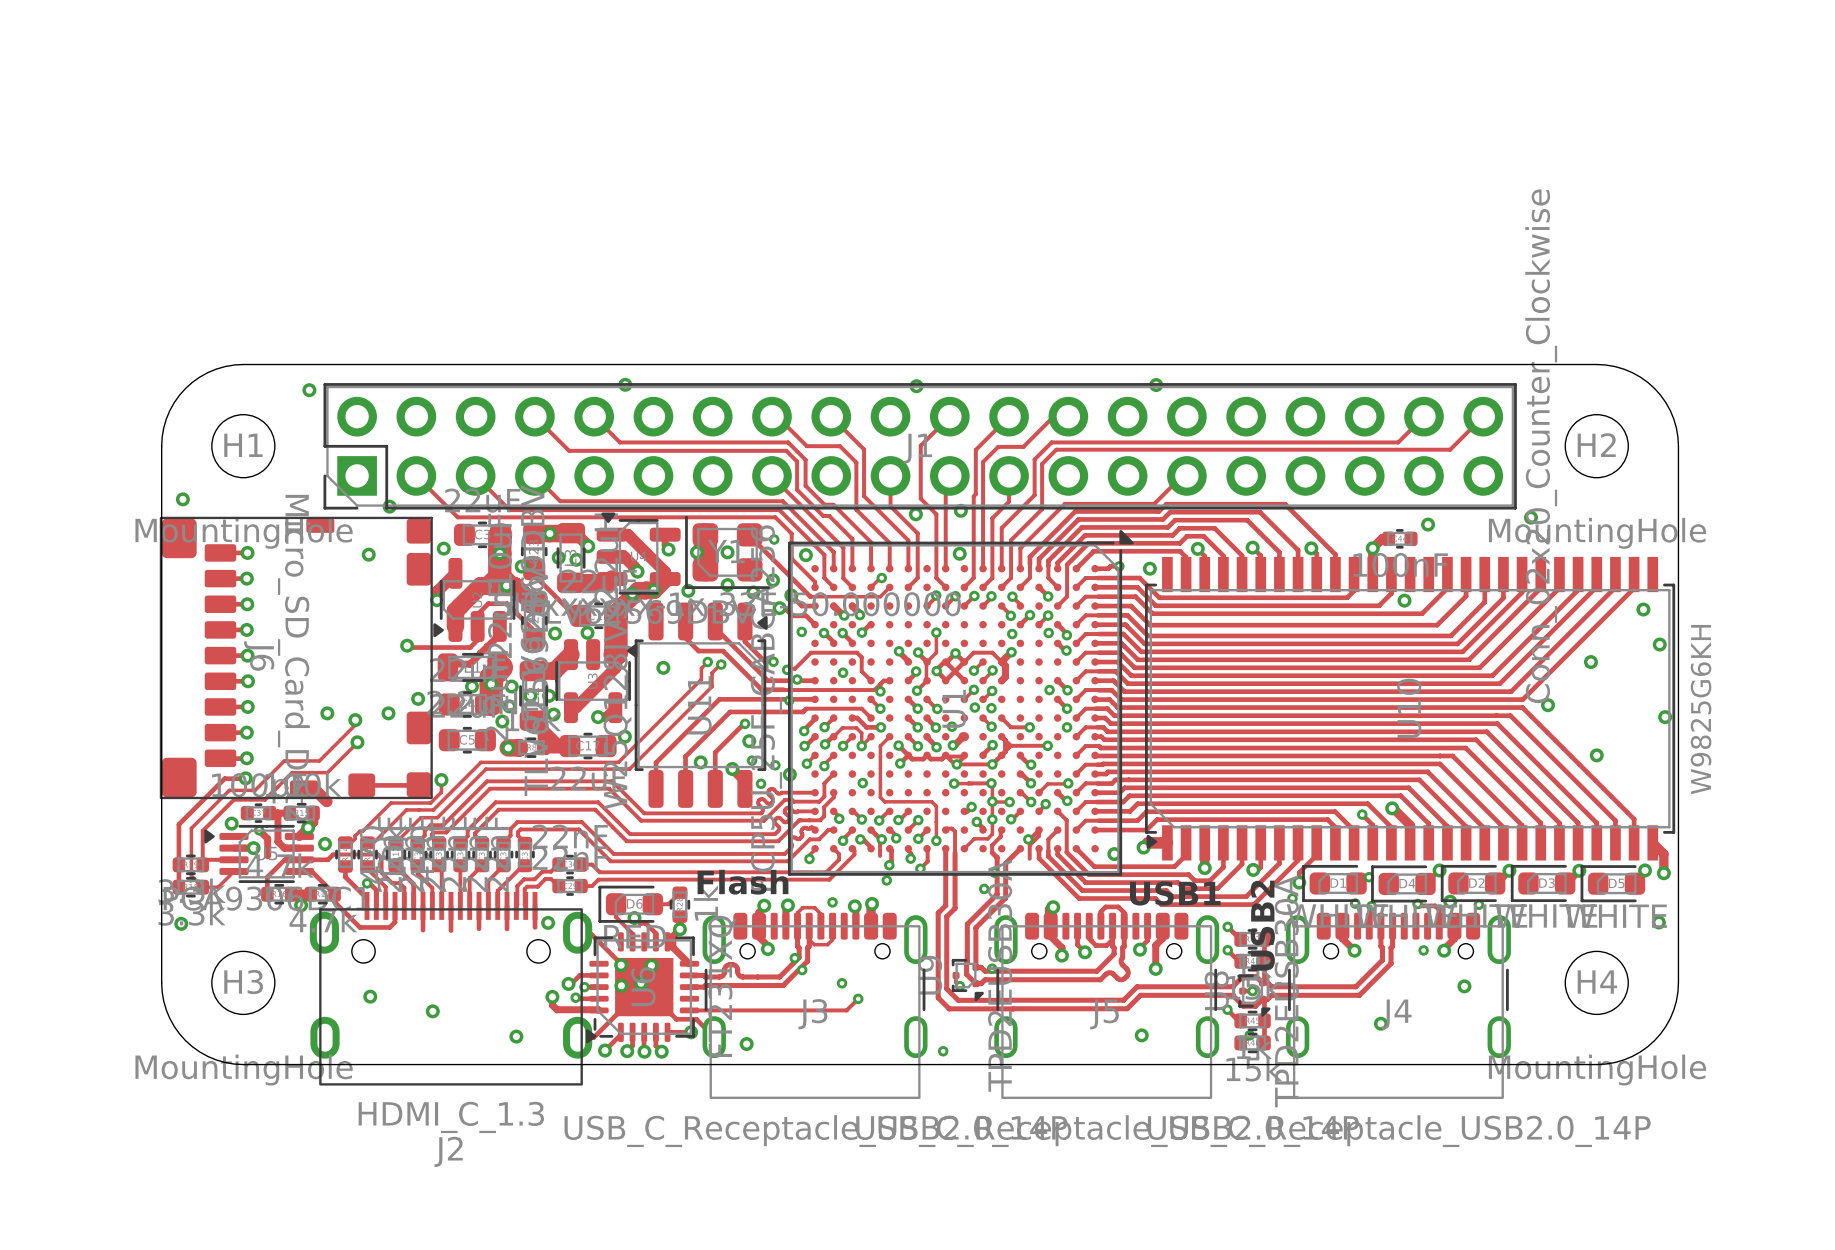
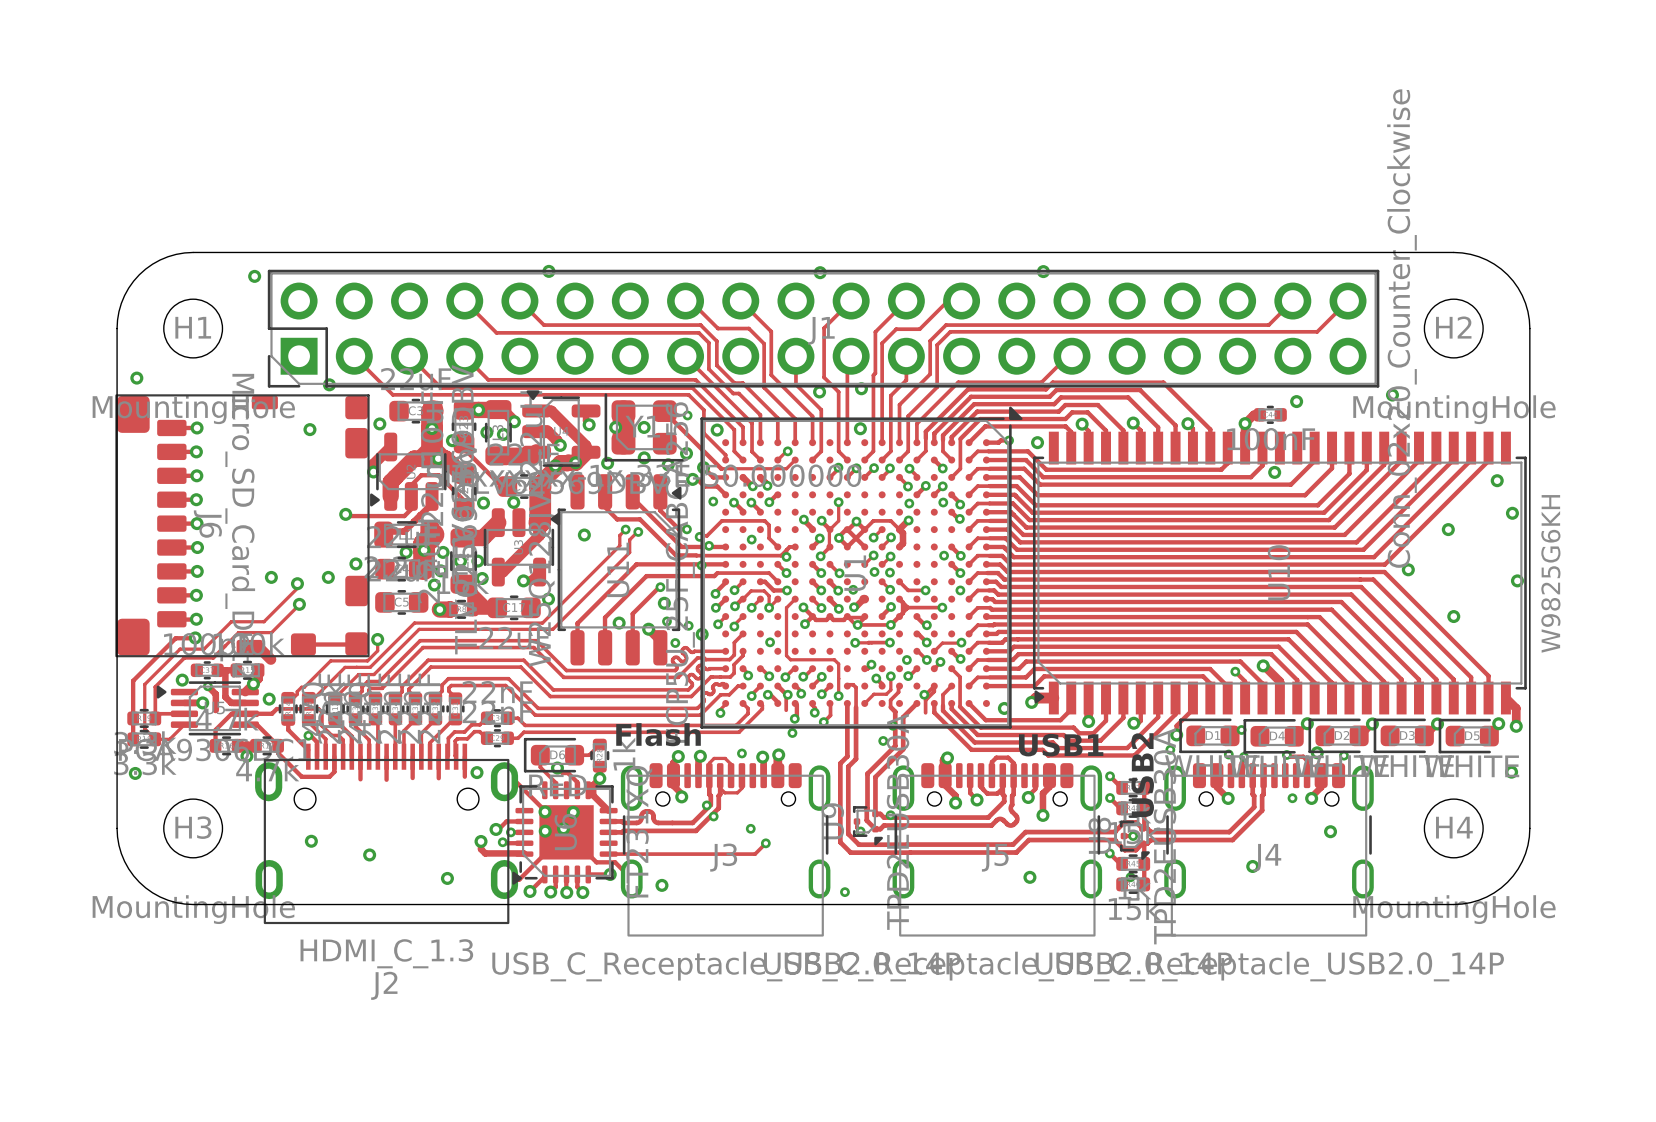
track: (991, 783) (992, 819) -> none
via: (992, 801) -> none
track: (1009, 802) (992, 802) -> none

